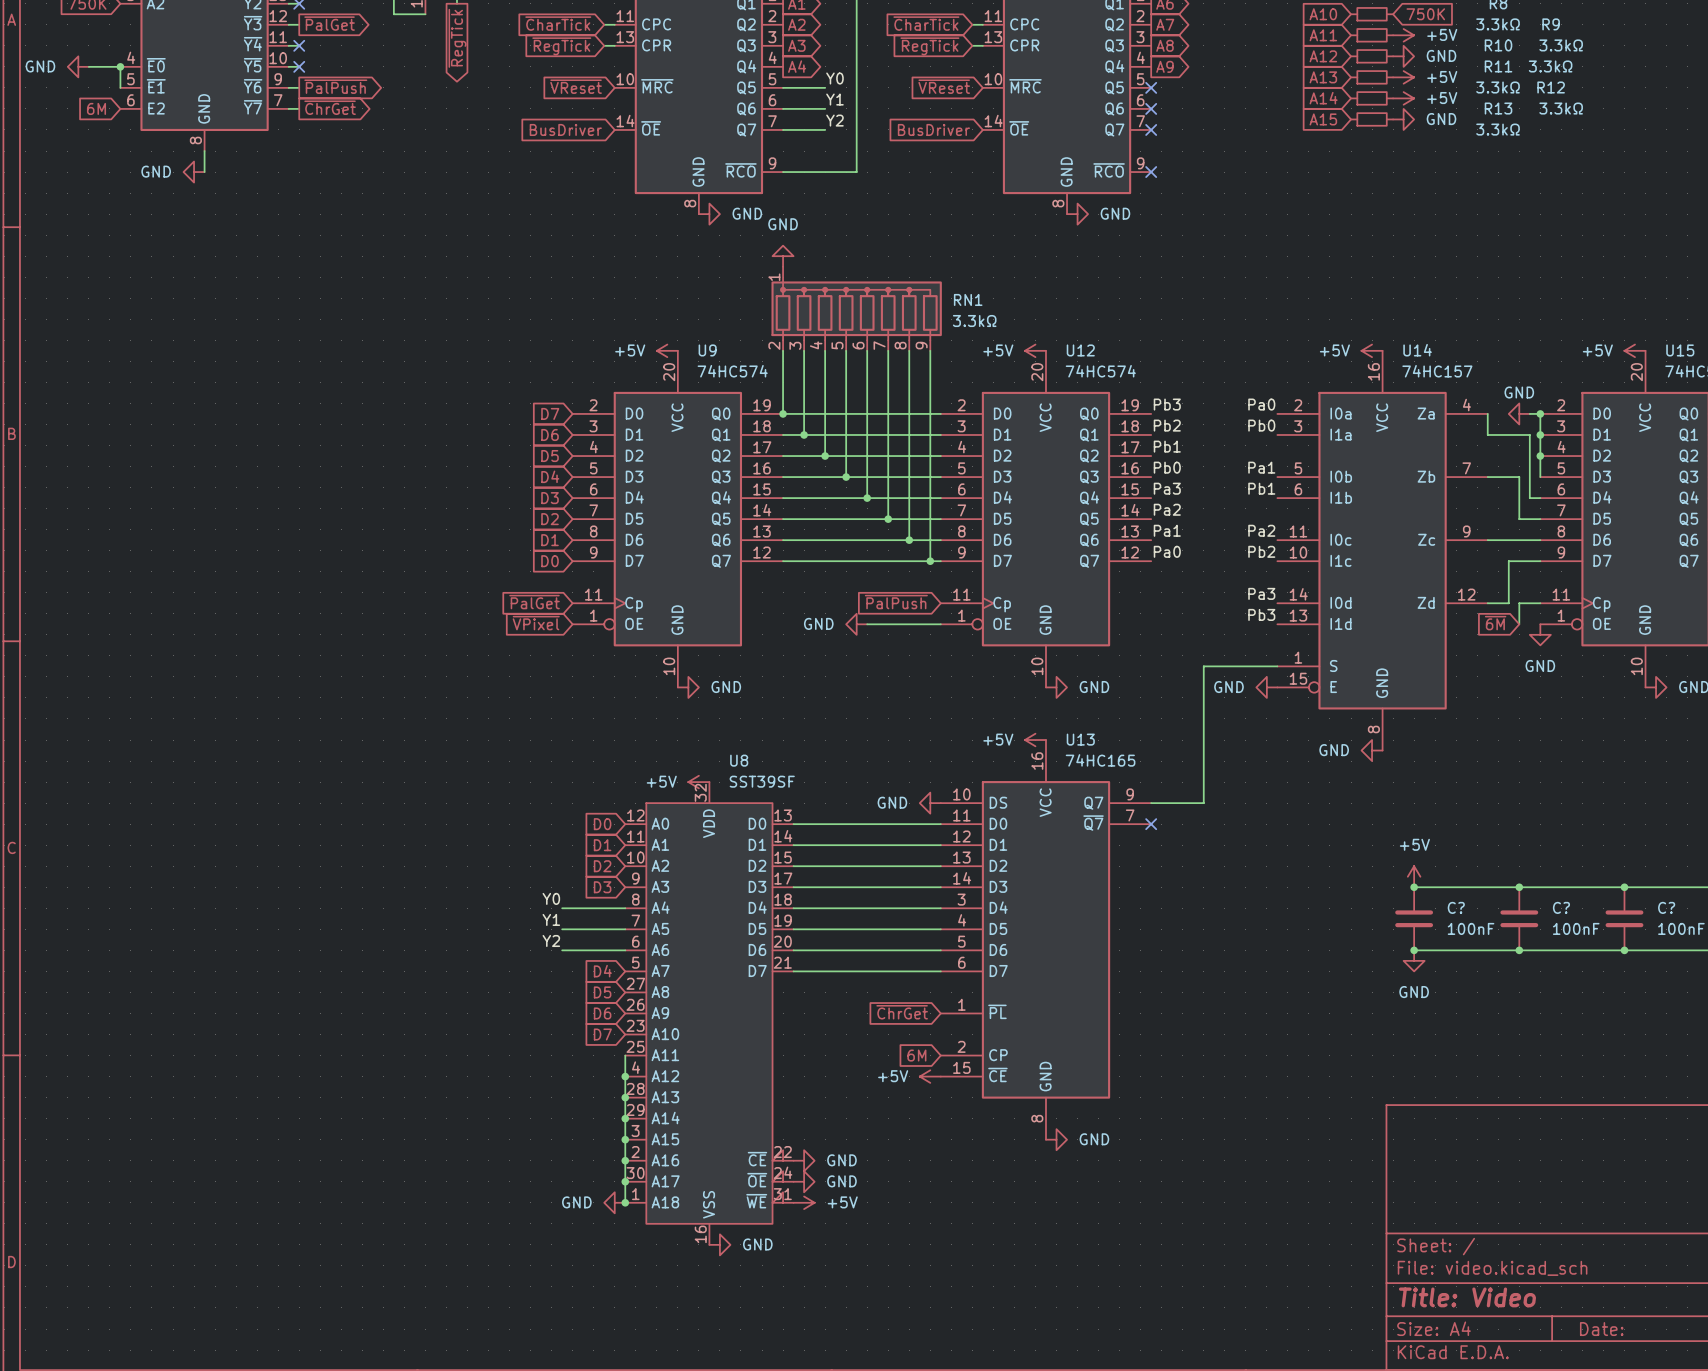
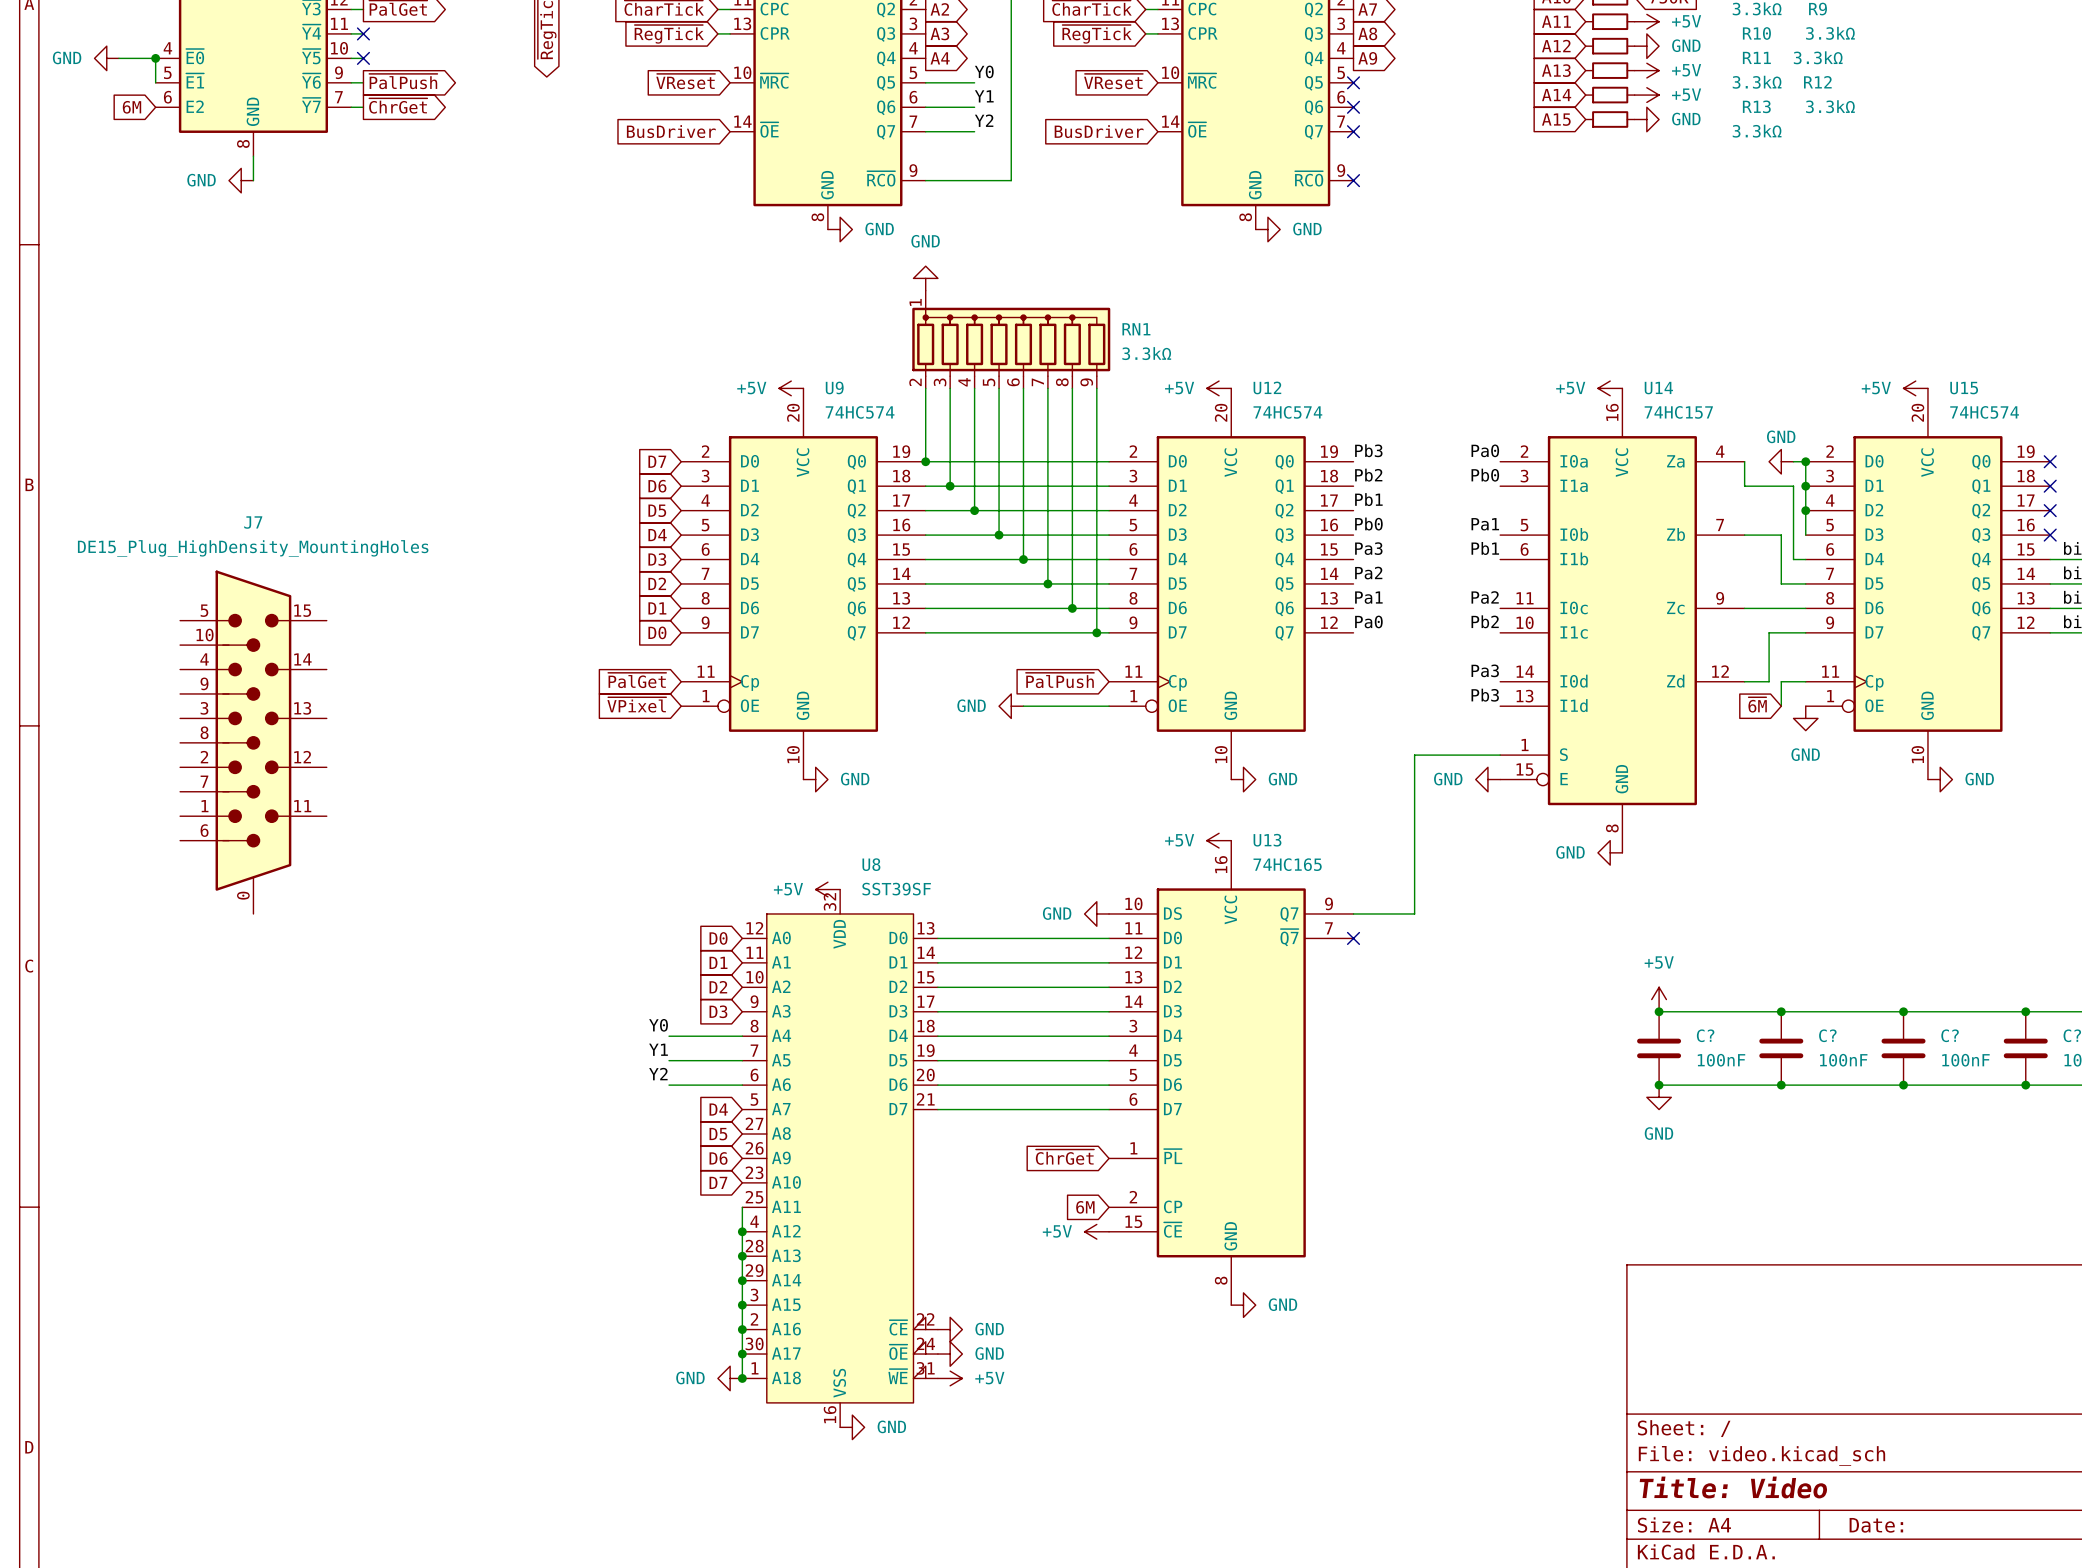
J7: none -> DE15_Plug_HighDensity_MountingHoles (253, 742)

